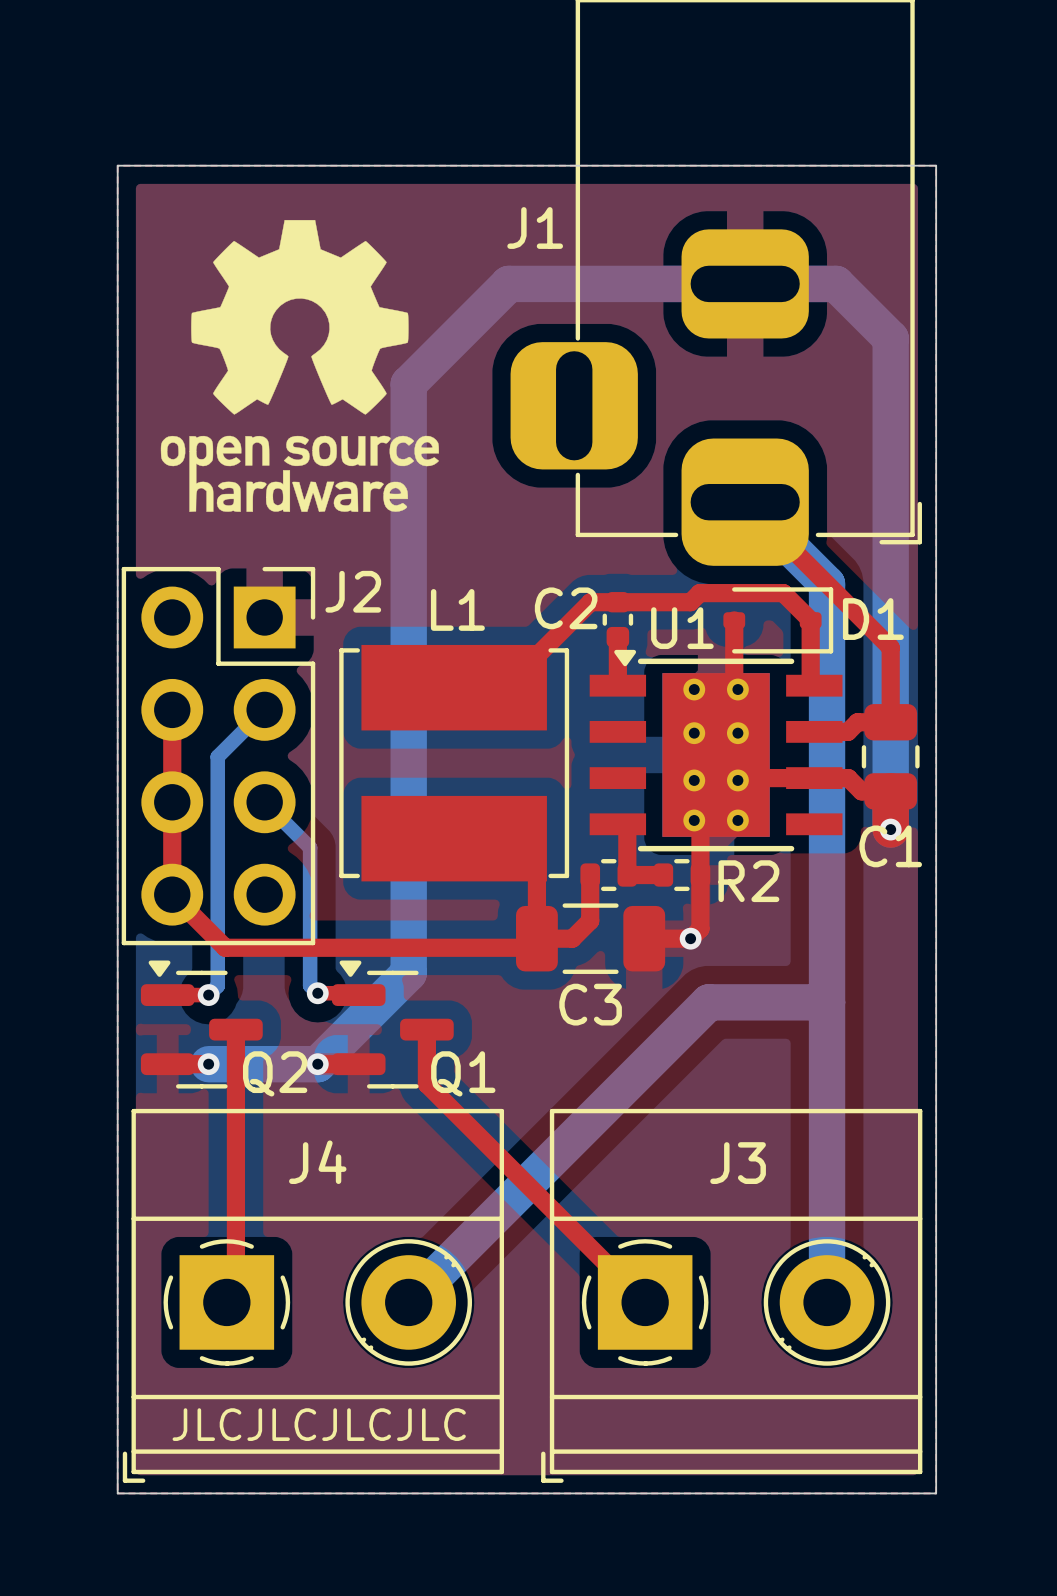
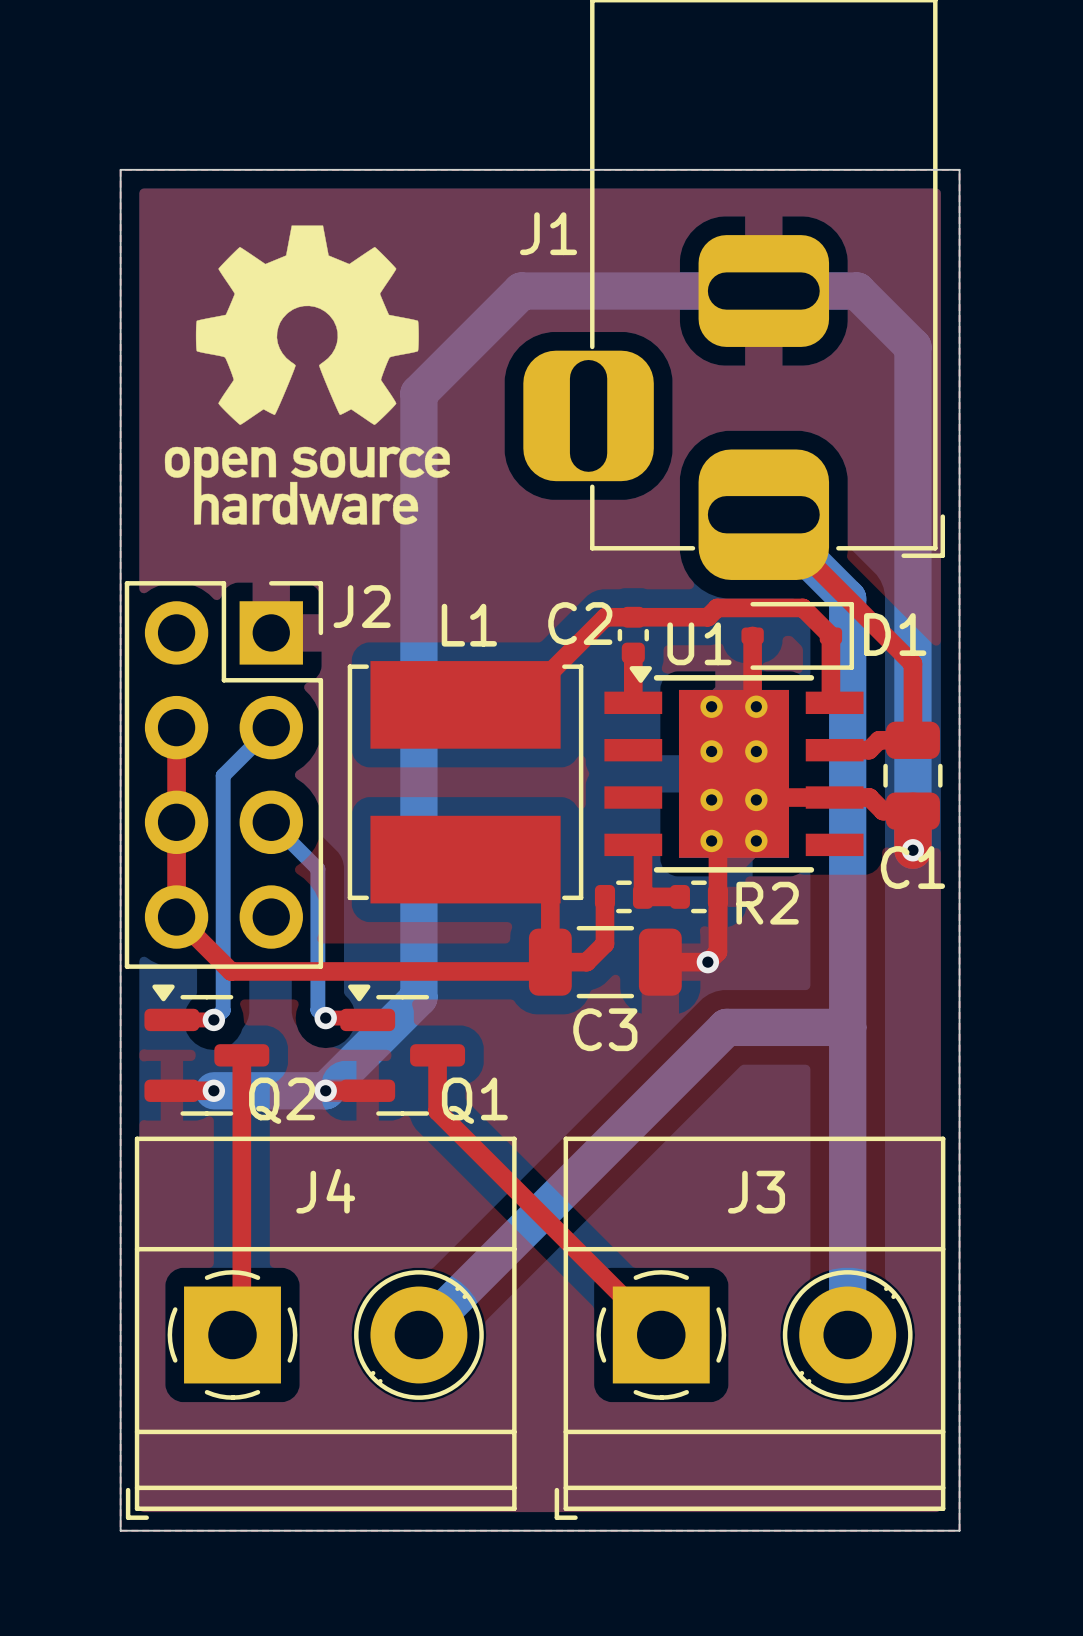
text: JLCJLCJLCJLC (319, 1424) -> none

